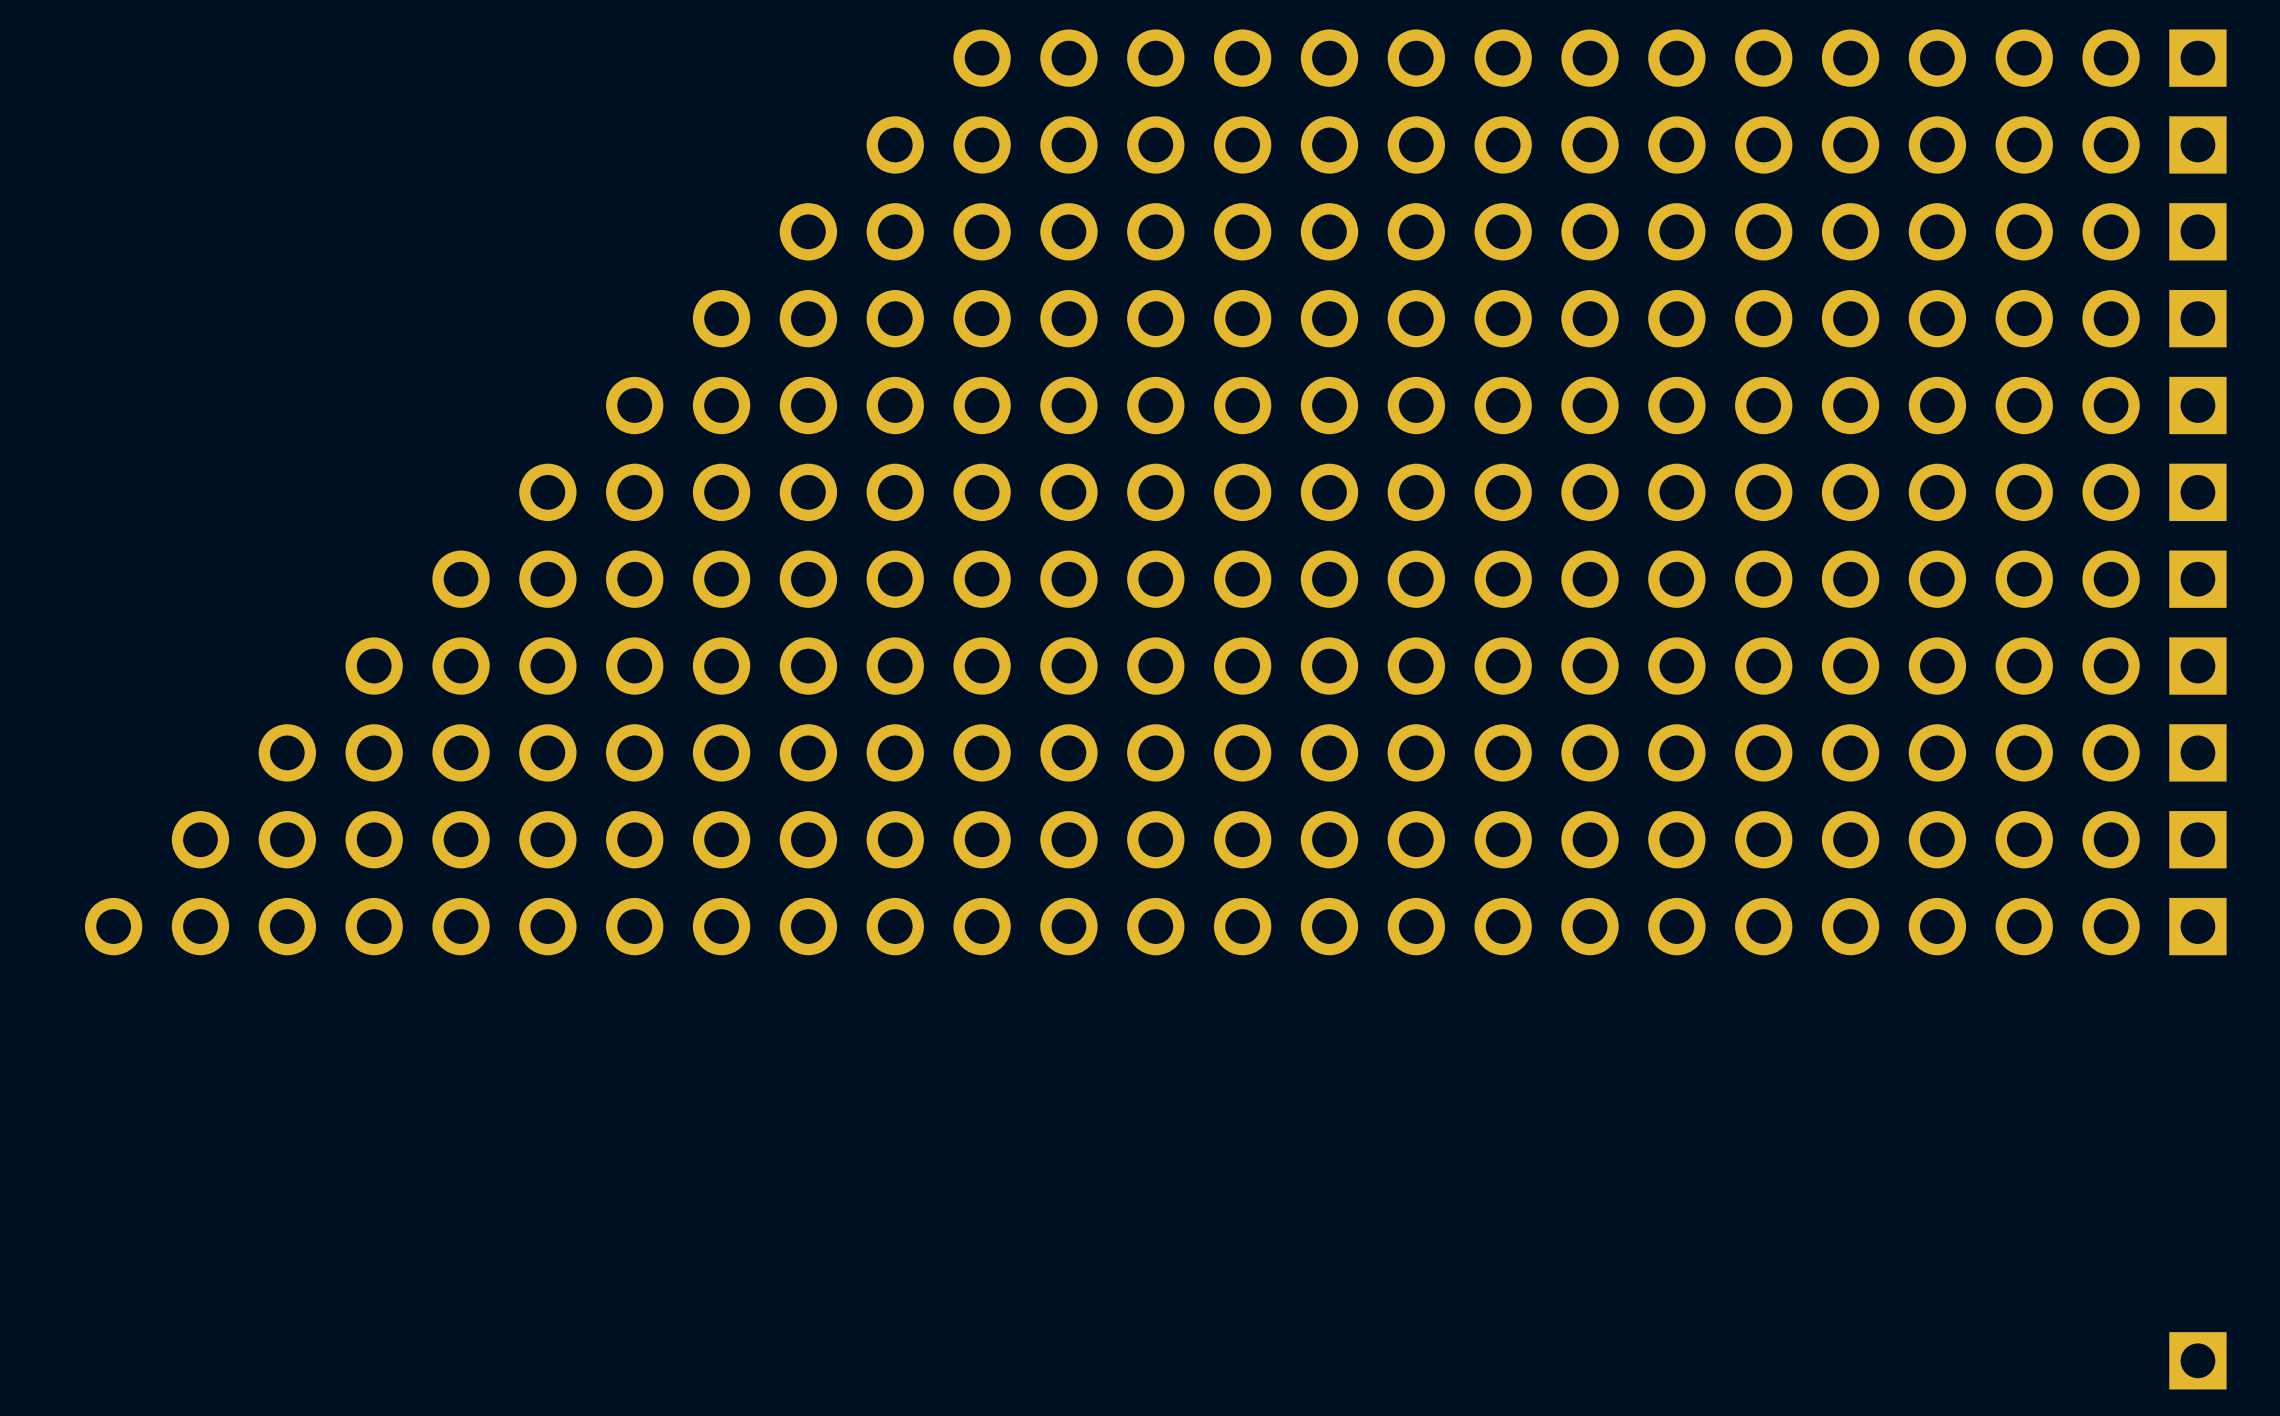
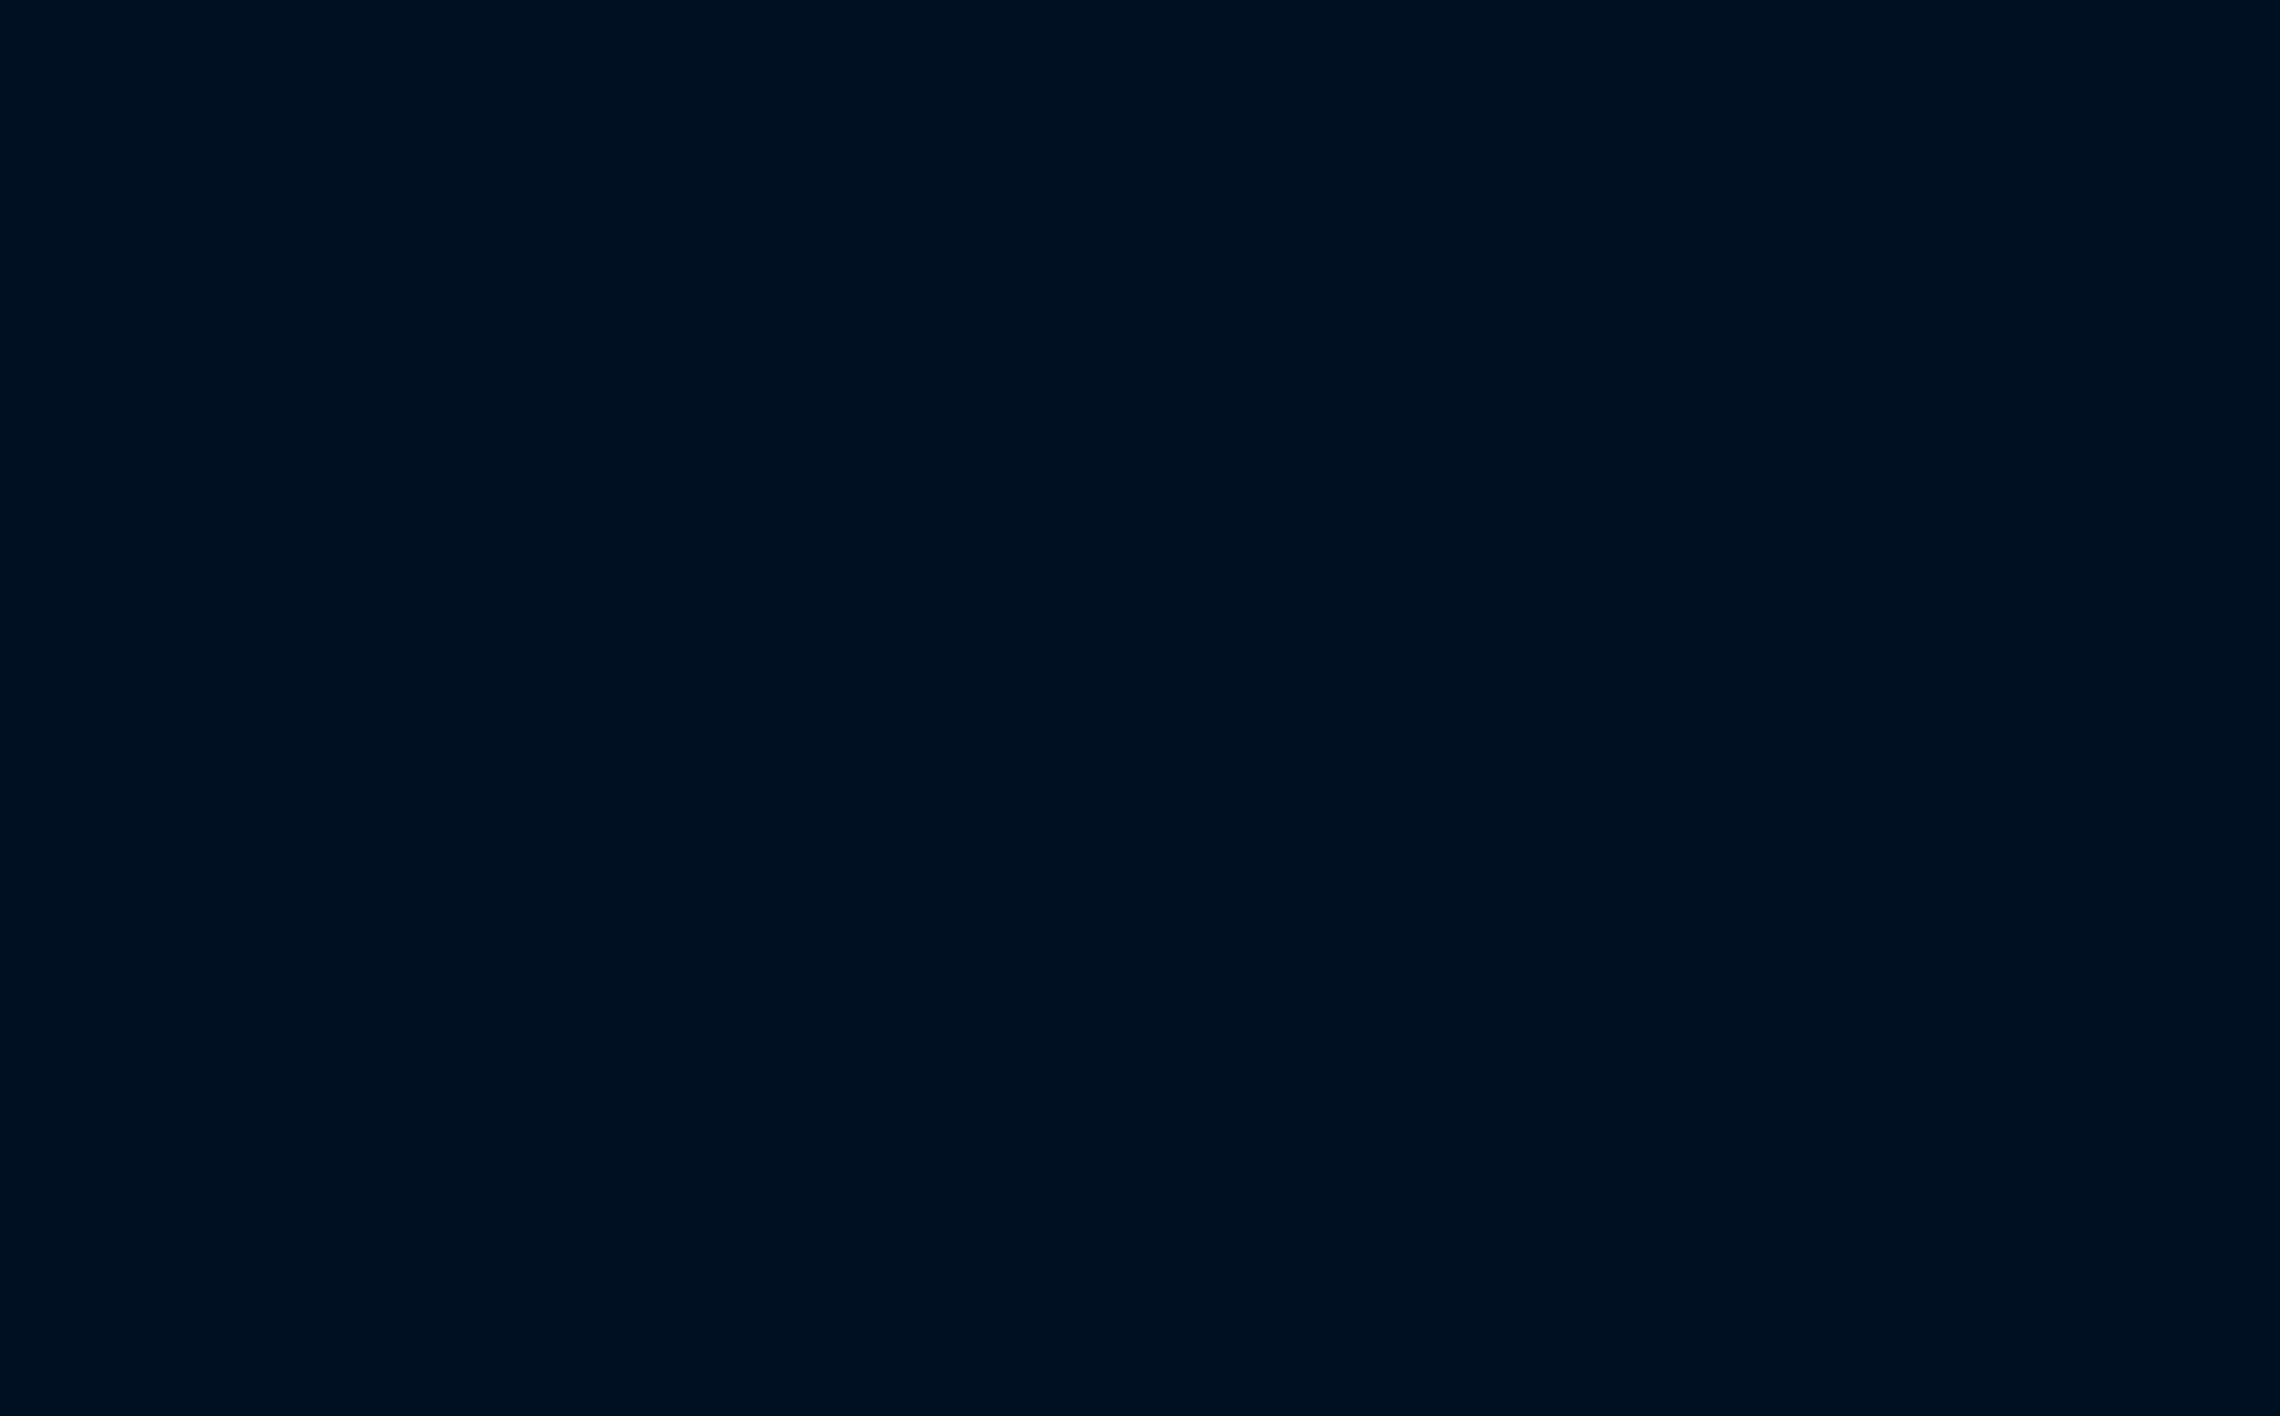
part: (1590, 58) -> none
part: (1546, 144) -> none
part: (1503, 231) -> none
part: (1459, 318) -> none
part: (1416, 405) -> none
part: (1372, 492) -> none
part: (1329, 579) -> none
part: (1286, 666) -> none
part: (1242, 752) -> none
part: (1199, 839) -> none
part: (1155, 926) -> none
part: (2197, 1360) -> none

